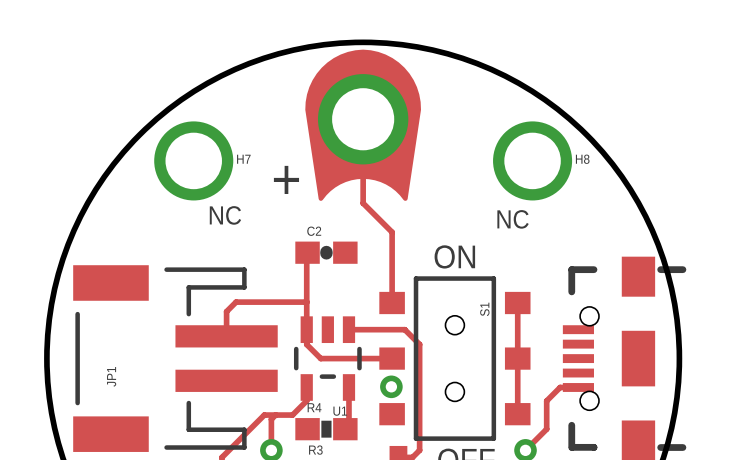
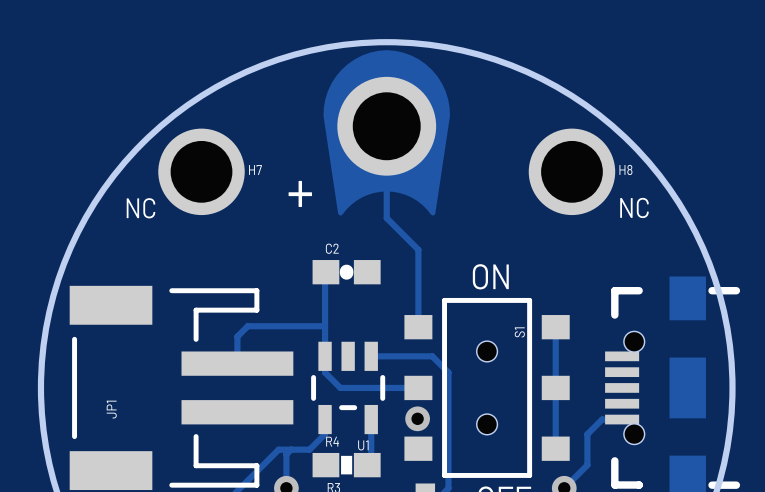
text position: NC (225, 215) -> NC (140, 208)
text position: NC (513, 219) -> NC (634, 207)

